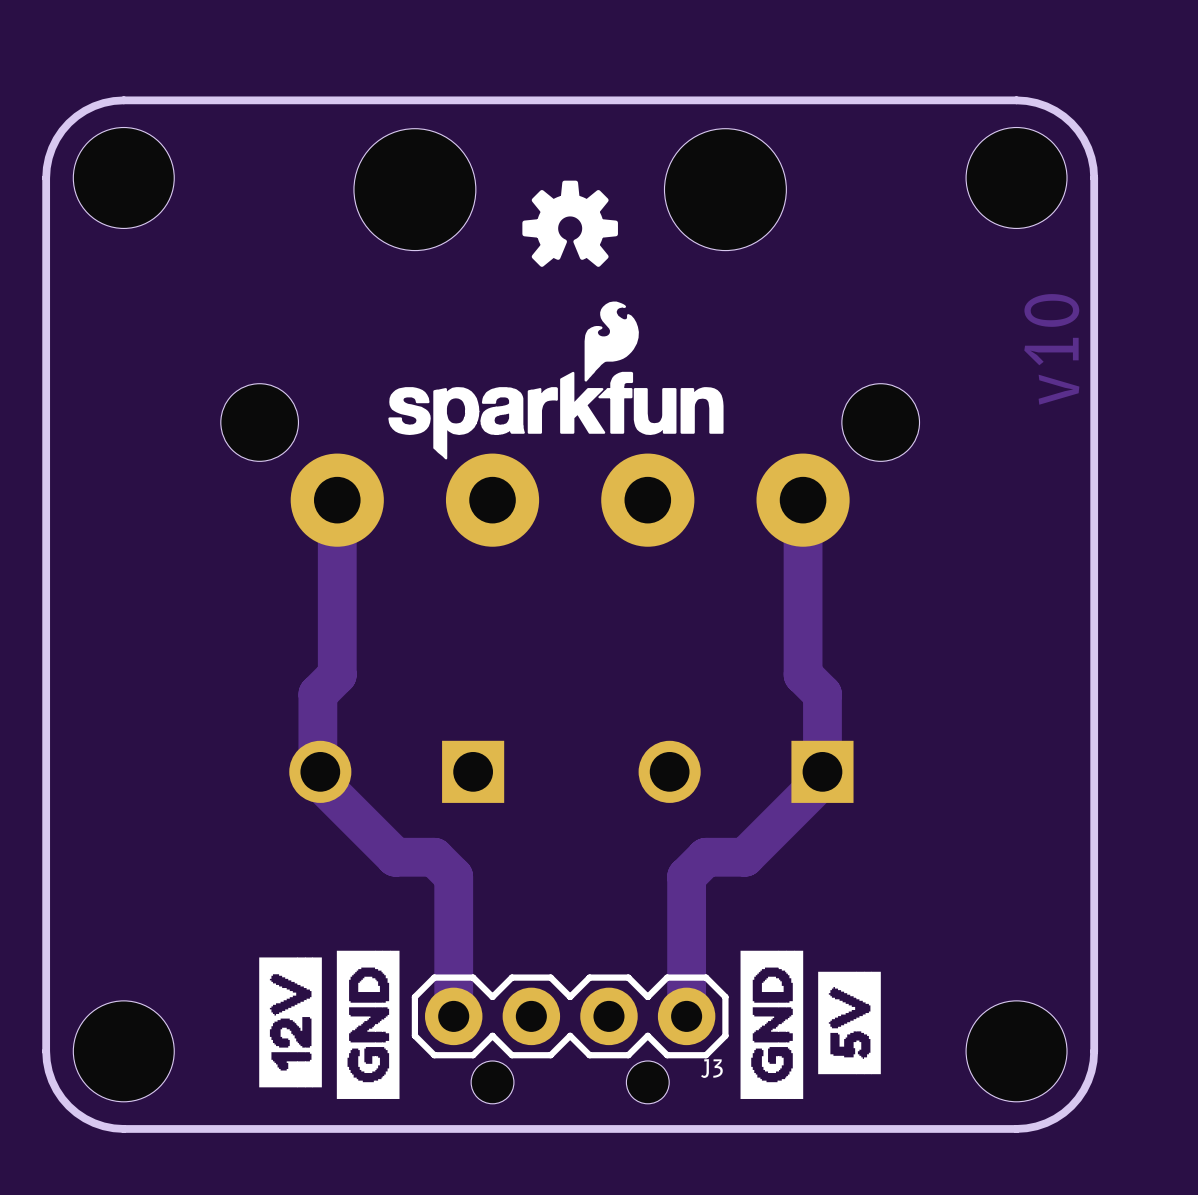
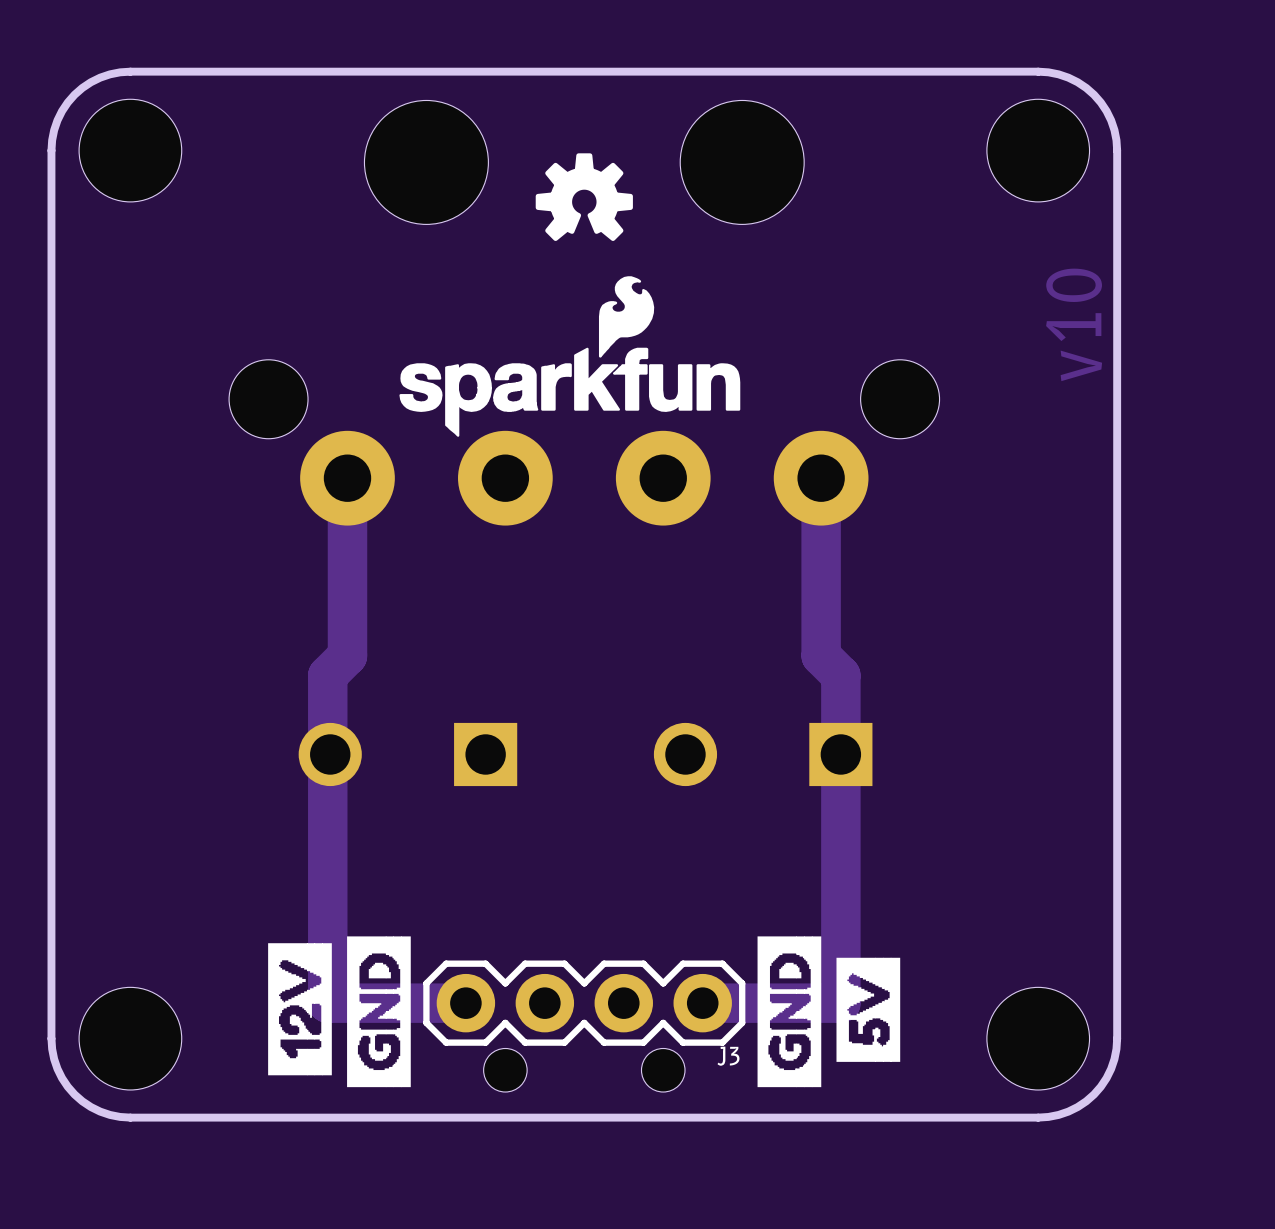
track: (317, 779) (395, 857) (434, 857) (453, 876) (453, 1016) -> (327, 762) (327, 1003) (465, 1003)
track: (822, 779) (744, 857) (706, 857) (686, 876) (686, 1016) -> (840, 754) (840, 1003) (702, 1003)

